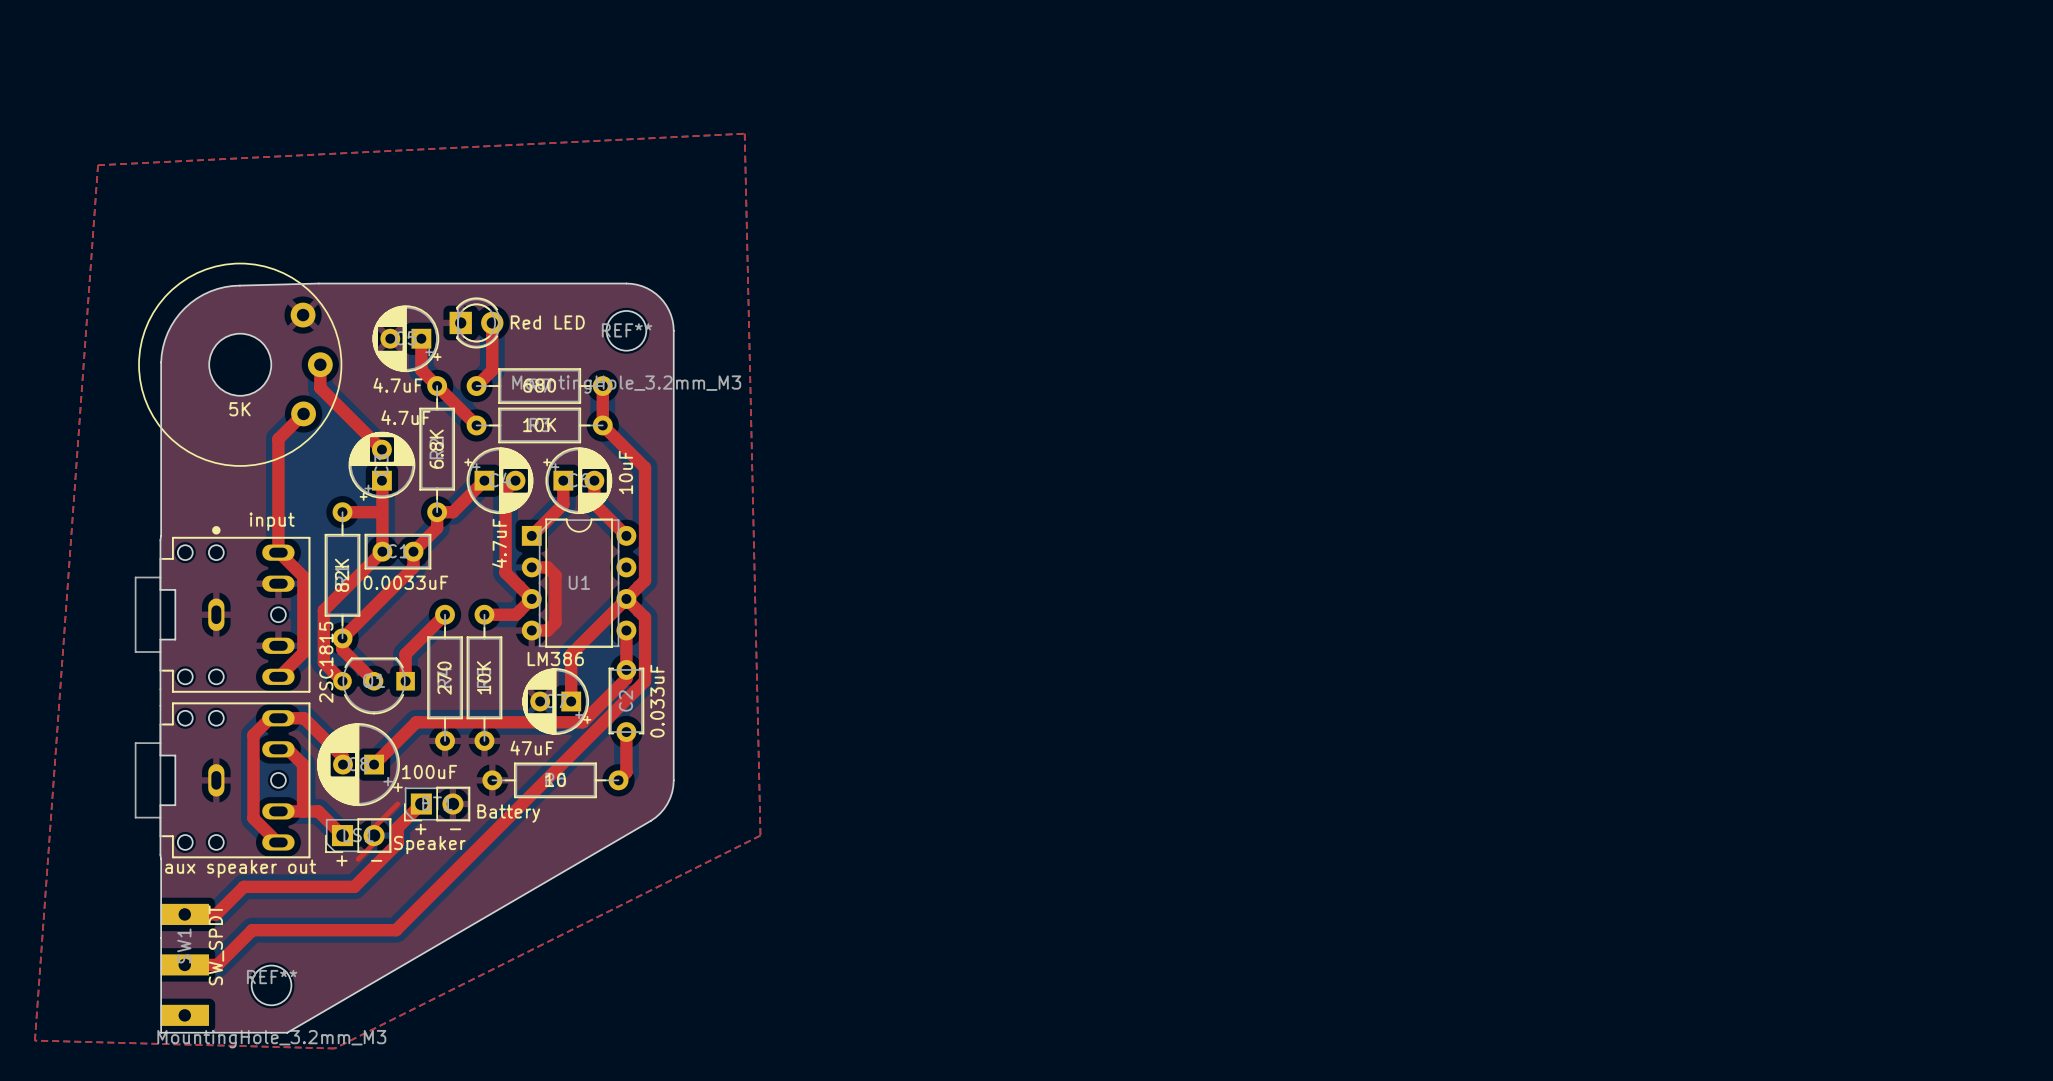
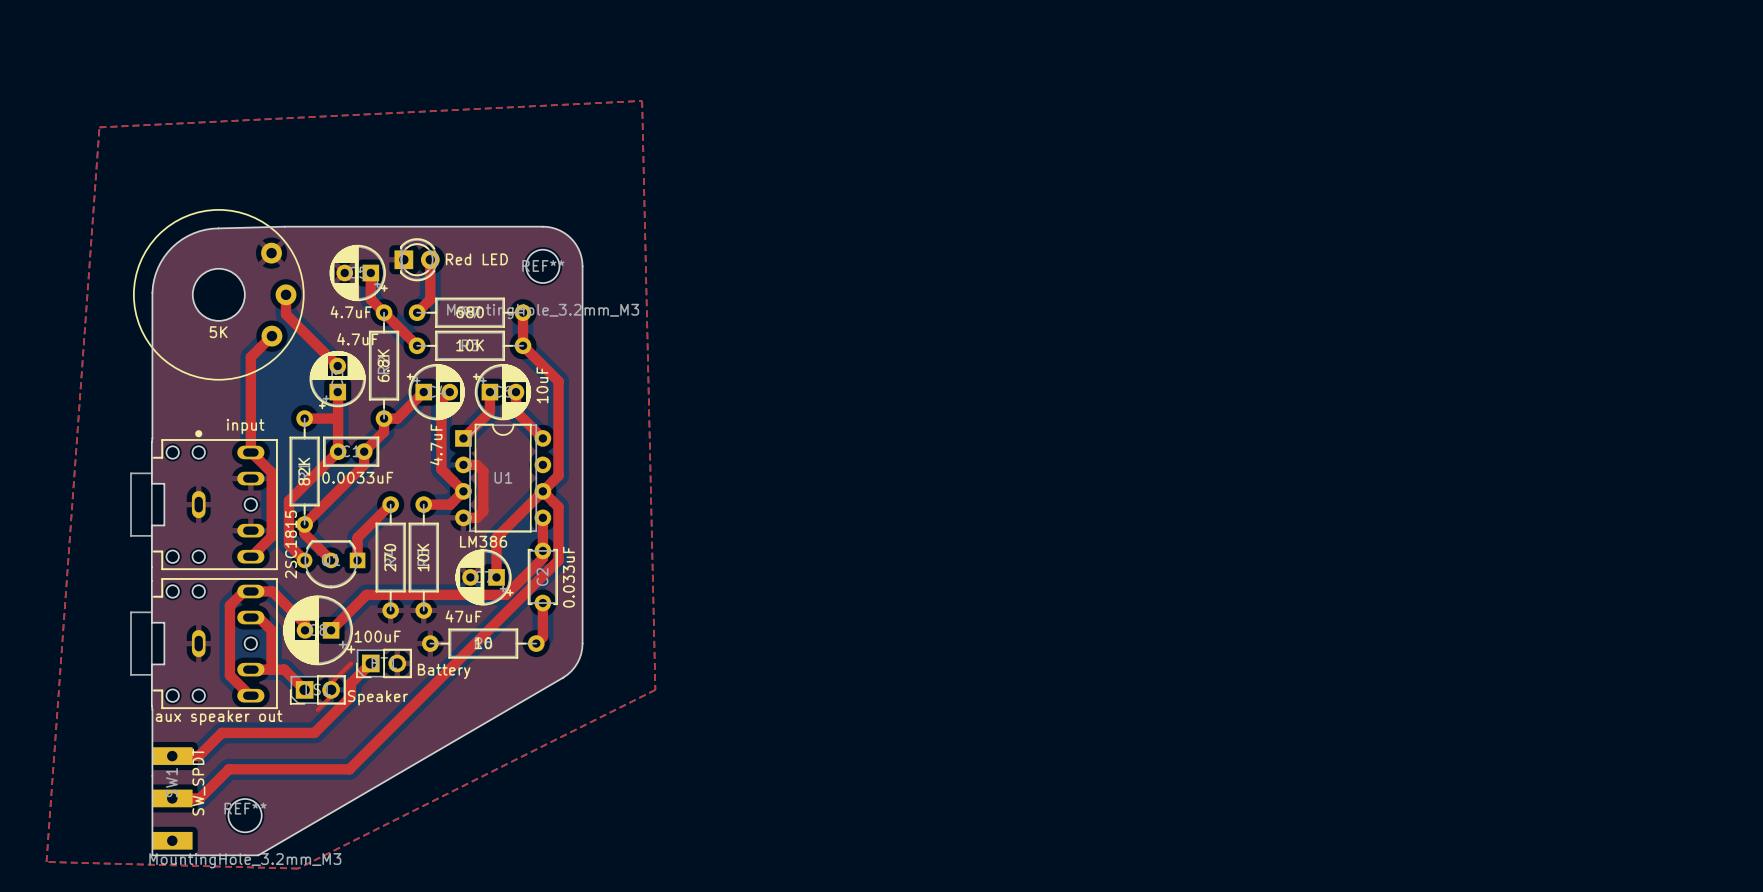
text: + (420, 829) -> none
text: - (455, 829) -> none
text: + (341, 860) -> none
text: - (376, 860) -> none

